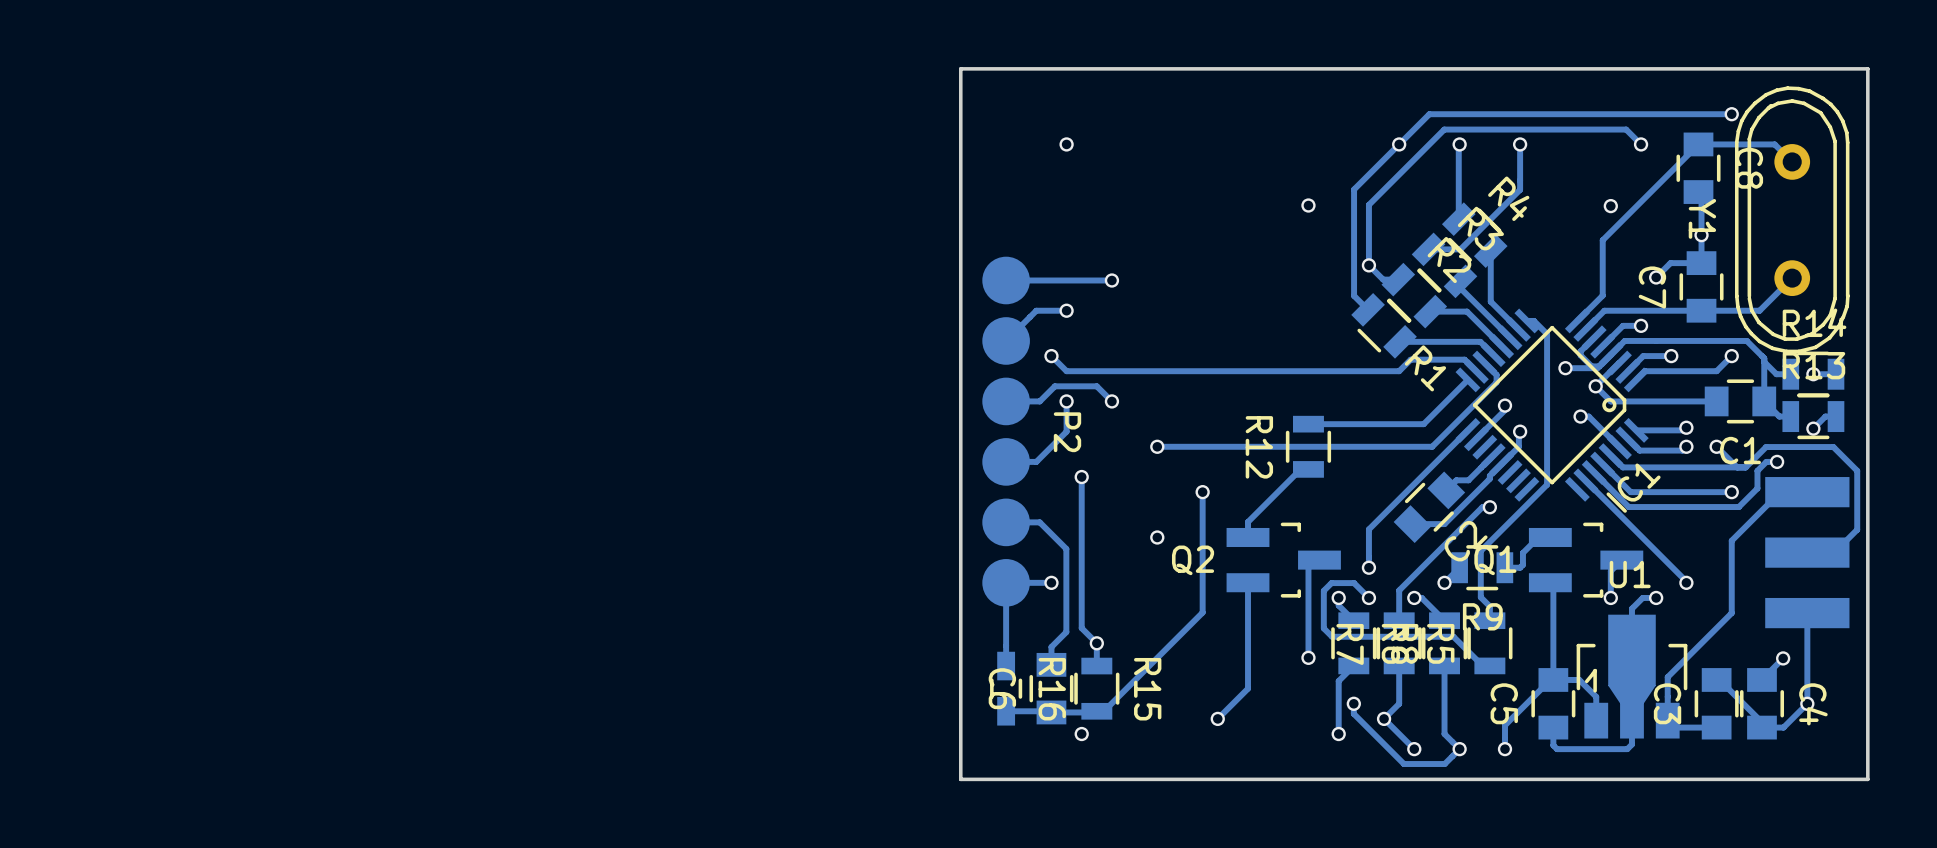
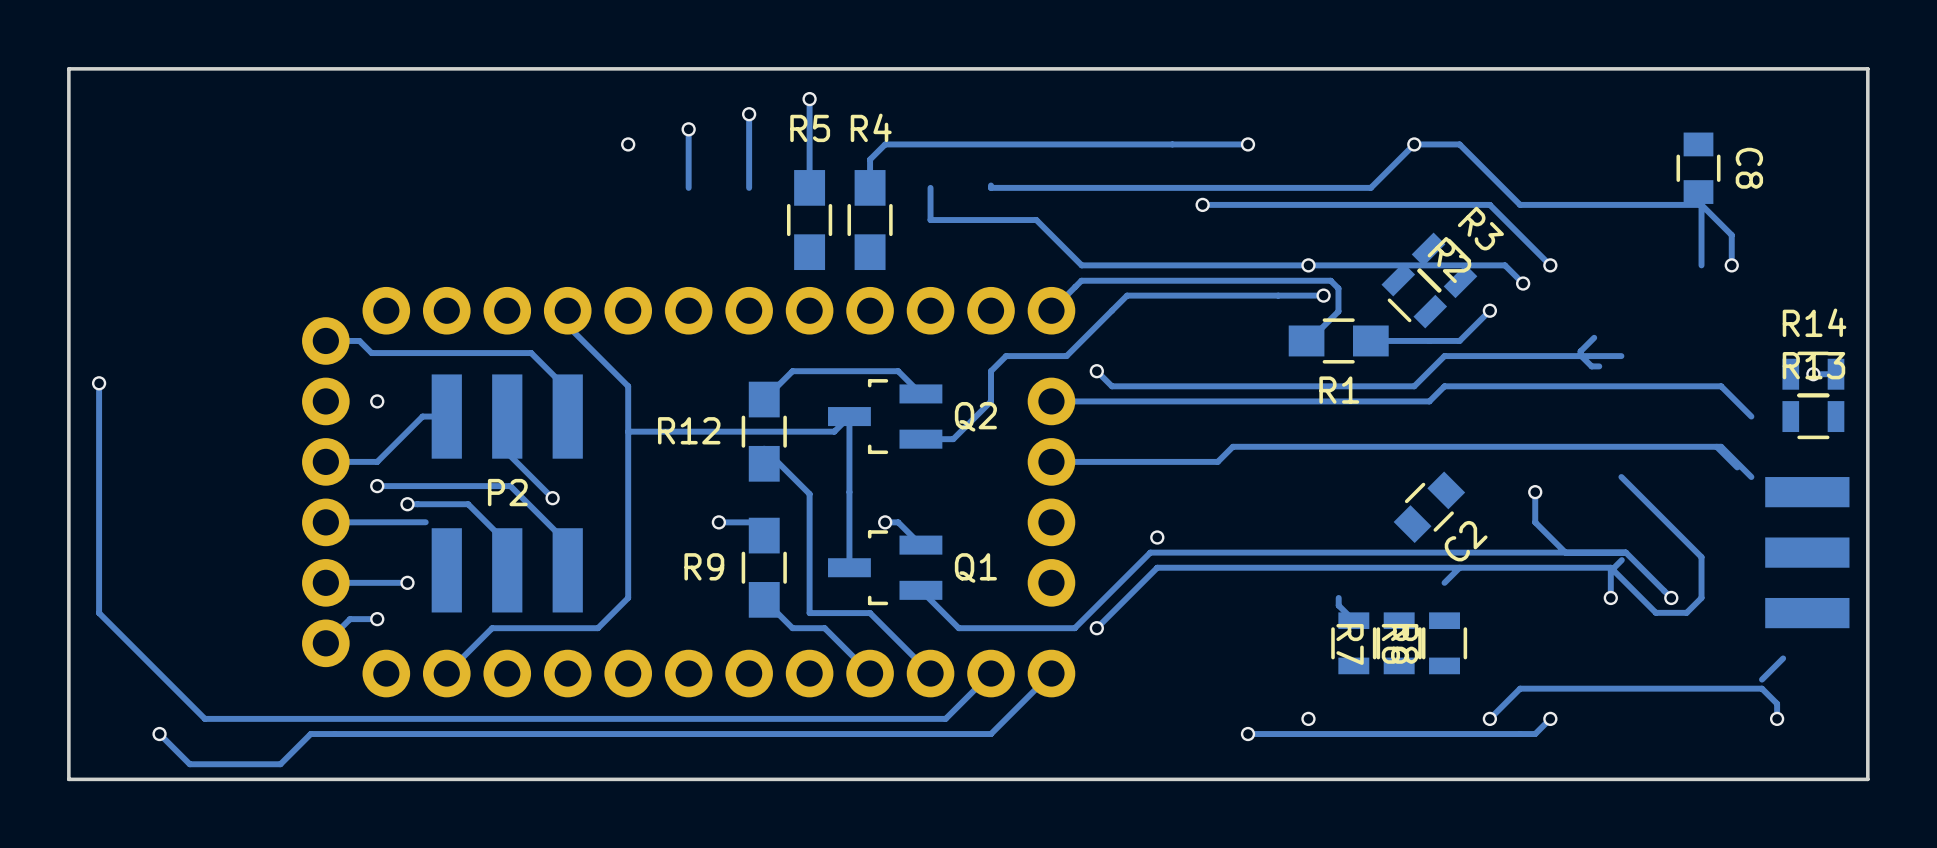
board edge: (960, 68) (960, 779) -> (960, 68) (68, 68) (68, 779) (960, 779)
track: none -> (809, 99) (809, 187)
via: none -> (809, 99)
track: none -> (749, 114) (749, 187)
via: none -> (749, 114)
track: (1731, 114) (1429, 114) (1354, 189) (1354, 295) (1368, 309) -> none
via: (1731, 114) -> none
track: none -> (688, 129) (688, 187)
via: none -> (688, 129)
via: none -> (628, 144)
via: (1066, 144) -> none
track: none -> (1248, 144) (885, 144) (870, 159) (870, 187)
via: none -> (1248, 144)
via position: (1399, 144) -> (1414, 144)
track: (1459, 144) (1458, 219) -> none
via: (1459, 144) -> none
track: (1520, 144) (1520, 189) (1460, 249) (1428, 249) -> none
via: (1520, 144) -> none
track: (1641, 144) (1626, 129) (1444, 129) (1368, 204) (1368, 265) (1383, 279) (1398, 279) -> none
via: (1641, 144) -> none
track: (1792, 161) (1774, 144) (1698, 144) (1602, 240) (1602, 295) (1577, 320) -> none
track: none -> (991, 185) (991, 187) (1370, 187) (1414, 144) (1459, 144) (1520, 204) (1701, 204) (1731, 235) (1731, 265)
track: none -> (930, 187) (930, 220) (1036, 220) (1081, 265) (1504, 265) (1523, 283)
R4 name position: R4 (1508, 198) -> R4 (871, 127)
R4 footprint: [1441, 202, 1508, 268] -> [847, 170, 893, 271]
track: none -> (1202, 204) (1489, 204) (1550, 265)
via: none -> (1202, 204)
via: (1308, 205) -> none
via: (1610, 206) -> none
Y1: (1792, 219) -> none
via: (1701, 235) -> none
track: (1490, 251) (1490, 301) (1518, 329) -> none
P2 footprint: [982, 256, 1030, 607] -> [431, 374, 583, 613]
track: (1701, 263) (1670, 263) (1656, 277) -> none
via: none -> (1308, 265)
via: (1368, 265) -> none
via: none -> (1550, 265)
via: none -> (1731, 265)
via: (1656, 277) -> none
track: (1792, 278) (1759, 310) (1604, 310) (1585, 329) -> none
track: (1111, 280) (1006, 280) -> none
via: (1111, 280) -> none
track: (1460, 281) (1460, 288) (1510, 337) -> none
via: none -> (1523, 283)
C7: (1701, 286) -> none
R1 footprint: [1351, 293, 1417, 359] -> [1288, 318, 1389, 364]
track: none -> (1323, 295) (1127, 295) (1066, 356) (1006, 356) (991, 371) (991, 401) (953, 439) (920, 439)
via: none -> (1323, 295)
track: none -> (567, 310) (567, 325) (628, 386) (628, 597) (597, 628) (492, 628) (446, 673)
track: none -> (1051, 310) (1081, 280) (1330, 280) (1338, 288) (1338, 311) (1308, 340) (1306, 340)
track: (1066, 310) (1036, 310) (1006, 340) -> none
via: (1066, 310) -> none
track: none -> (1489, 310) (1459, 340) (1370, 340)
via: none -> (1489, 310)
track: (1430, 311) (1467, 311) (1501, 346) -> none
track: (1526, 320) (1533, 320) (1547, 334) (1547, 484) (1480, 551) (1480, 597) (1489, 606) (1489, 620) -> none
track: (1641, 325) (1622, 325) (1602, 346) -> none
via: (1641, 325) -> none
track: none -> (325, 340) (359, 340) (371, 353) (531, 353) (567, 389) (567, 416)
track: (1400, 341) (1480, 341) (1493, 354) -> none
track: (1051, 356) (1066, 371) (1399, 371) (1410, 359) (1464, 359) (1476, 371) -> none
via: (1051, 356) -> none
track: none -> (1621, 356) (1444, 356) (1414, 386) (1111, 386) (1096, 371)
track: (1671, 356) (1643, 356) (1627, 371) -> none
via: (1671, 356) -> none
track: (1731, 356) (1716, 371) (1644, 371) (1636, 379) -> none
via: (1731, 356) -> none
track: (1764, 361) (1776, 374) (1790, 374) -> none
track: (1484, 363) (1496, 374) (1496, 382) (1432, 446) -> (1751, 477) (1721, 446) (1432, 446)
track: (1619, 363) (1595, 386) (1610, 401) (1716, 401) -> none
track: (1565, 368) (1597, 368) (1624, 340) (1746, 340) (1764, 358) (1764, 401) (1779, 416) (1790, 416) -> none
via: (1565, 368) -> none
via: none -> (1096, 371)
track: (1467, 379) (1423, 424) (1308, 424) -> none
track: none -> (99, 383) (99, 613) (204, 718) (945, 718) (991, 673)
via: none -> (99, 383)
via: (1595, 386) -> none
track: none -> (920, 393) (898, 371) (792, 371) (764, 399)
via: none -> (377, 401)
track: none -> (1051, 401) (1429, 401) (1444, 386) (1721, 386) (1751, 416)
track: (1066, 401) (1066, 431) (1036, 461) (1006, 461) -> none
via: (1066, 401) -> none
track: (1111, 401) (1096, 386) (1054, 386) (1039, 401) (1006, 401) -> none
via: (1111, 401) -> none
C1: (1740, 401) -> none
track: (1504, 405) (1504, 410) (1476, 438) -> none
via: (1504, 405) -> none
IC1: (1552, 405) -> none
R12 footprint: [1285, 415, 1332, 478] -> [741, 381, 787, 482]
track: none -> (446, 416) (422, 416) (377, 461) (325, 461)
track: none -> (507, 416) (507, 452) (552, 498)
track: (1580, 416) (1588, 416) (1619, 447) -> none
via: (1580, 416) -> none
track: (1836, 416) (1825, 416) (1813, 428) -> none
track: (1686, 427) (1683, 430) (1636, 430) -> none
via: (1686, 427) -> none
via: (1813, 428) -> none
track: (1467, 430) (1368, 529) (1368, 567) -> none
track: none -> (628, 431) (834, 431) (849, 416) (849, 567)
track: (1520, 431) (1518, 446) (1444, 524) (1412, 524) -> none
via: (1520, 431) -> none
P2 name position: P2 (1067, 432) -> P2 (507, 492)
track: (1627, 438) (1639, 450) (1682, 450) (1686, 446) -> none
via: (1157, 446) -> none
track: (1232, 446) (1157, 446) -> (1232, 446) (1217, 461) (1051, 461)
via: (1686, 446) -> none
via: (1716, 446) -> none
track: none -> (764, 448) (809, 494) (809, 613) (870, 613) (930, 673)
track: (1493, 455) (1468, 480) (1456, 480) (1446, 490) -> none
track: (1611, 455) (1622, 467) (1745, 467) (1766, 447) (1833, 447) (1857, 470) (1857, 529) (1834, 552) (1807, 552) -> none
track: (1777, 461) (1766, 461) (1757, 470) (1757, 488) (1738, 507) (1628, 507) (1594, 472) -> none
via: (1777, 461) -> none
track: (1602, 464) (1630, 492) (1731, 492) -> none
track: (1308, 469) (1300, 469) (1248, 522) (1248, 537) -> none
track: (1081, 477) (1081, 628) (1096, 643) (1096, 666) -> none
via: (1081, 477) -> none
track: (1585, 480) (1686, 582) -> none
track: none -> (377, 486) (510, 486) (567, 543) (567, 570)
via: none -> (377, 486)
part: none -> (688, 492)
track: (1202, 492) (1202, 612) (1103, 711) (1006, 711) -> none
via: (1202, 492) -> none
track: none -> (1535, 492) (1535, 522) (1565, 552)
via: none -> (1535, 492)
via: (1731, 492) -> none
track: (1807, 492) (1780, 492) (1731, 540) (1731, 613) (1667, 677) (1667, 720) (1674, 727) (1716, 727) -> none
via: none -> (552, 498)
track: none -> (407, 504) (468, 504) (507, 543) (507, 570)
via: none -> (407, 504)
track: (1489, 507) (1482, 507) (1399, 590) (1399, 620) -> none
via: (1489, 507) -> none
track: none -> (425, 522) (325, 522)
track: none -> (718, 522) (751, 522) (764, 535)
via: none -> (718, 522)
track: none -> (885, 522) (898, 522) (920, 545)
via: none -> (885, 522)
track: (1006, 522) (1039, 522) (1066, 548) (1066, 632) (1051, 647) (1051, 664) -> none
track: (1550, 537) (1538, 537) (1522, 552) (1522, 564) (1520, 567) -> (1621, 477) (1701, 557) (1701, 597) (1686, 612) (1655, 612) (1610, 567) (1520, 567)
R9 footprint: [1451, 545, 1514, 591] -> [741, 517, 787, 618]
Q2 rotation: 0° (1283, 560) -> 180° (885, 416)
Q2 position: (1283, 560) -> (885, 416)
track: (1319, 560) (1316, 560) (1308, 567) (1308, 657) -> none
Q1 rotation: 0° (1586, 560) -> 180° (885, 567)
Q1 position: (1586, 560) -> (885, 567)
via: (1368, 567) -> none
track: none -> (1504, 567) (1157, 567) (1096, 628)
track: none -> (407, 582) (325, 582)
via: none -> (407, 582)
track: (1051, 582) (1006, 582) (1006, 666) -> none
via: (1051, 582) -> none
track: (1248, 582) (1248, 688) (1217, 718) -> none
via: (1444, 582) -> none
track: (1550, 582) (1553, 585) (1553, 679) -> none
via: (1686, 582) -> none
track: none -> (920, 590) (958, 628) (1074, 628) (1150, 552) (1625, 552) (1671, 597)
via: (1338, 597) -> none
track: (1368, 597) (1354, 583) (1331, 583) (1323, 590) (1323, 628) (1332, 636) (1453, 636) (1482, 665) (1489, 665) -> none
via: (1368, 597) -> none
track: (1414, 597) (1421, 597) (1444, 620) -> none
via: (1414, 597) -> none
track: (1656, 597) (1642, 597) (1631, 608) (1631, 744) (1627, 749) (1557, 749) (1553, 745) (1553, 727) -> none
via: (1656, 597) -> none
via: none -> (1671, 597)
track: none -> (764, 599) (792, 628) (824, 628) (870, 673)
R5 footprint: [1467, 612, 1513, 675] -> [786, 170, 833, 271]
track: (1807, 613) (1807, 703) (1783, 727) (1761, 727) (1761, 722) (1719, 679) (1716, 679) -> none
R9 name position: R9 (1482, 616) -> R9 (704, 566)
track: none -> (377, 619) (350, 619) (325, 643)
via: none -> (377, 619)
via position: (1096, 643) -> (1096, 628)
R5 name position: R5 (1440, 643) -> R5 (810, 128)
via: (1308, 657) -> none
via: (1783, 658) -> none
track: (1353, 665) (1338, 681) (1338, 734) -> none
track: (1399, 665) (1399, 703) (1384, 718) (1414, 749) -> none
track: (1444, 665) (1444, 734) (1459, 749) (1444, 764) (1403, 764) (1353, 713) (1353, 703) -> none
track: none -> (1051, 673) (991, 734) (310, 734) (280, 764) (189, 764) (159, 734)
U1: (1631, 676) -> none
R16: (1006, 688) -> none
C6: (1051, 688) -> none
R15: (1096, 688) -> none
via: (1353, 703) -> none
C5: (1553, 703) -> none
C3: (1716, 703) -> none
C4: (1761, 703) -> none
via: (1807, 703) -> none
via position: (1217, 718) -> (1248, 734)
via: none -> (1308, 718)
via: (1384, 718) -> none
via: none -> (1489, 718)
track: none -> (1550, 718) (1535, 734) (1248, 734)
via: none -> (1550, 718)
track: none -> (1777, 718) (1777, 703) (1761, 688) (1520, 688) (1489, 718)
via: none -> (1777, 718)
track: (1596, 720) (1596, 696) (1579, 679) (1550, 679) (1504, 725) (1504, 749) -> none
via: none -> (159, 734)
via: (1081, 734) -> none
via: (1338, 734) -> none
via: (1414, 749) -> none
via: (1459, 749) -> none
via: (1504, 749) -> none

